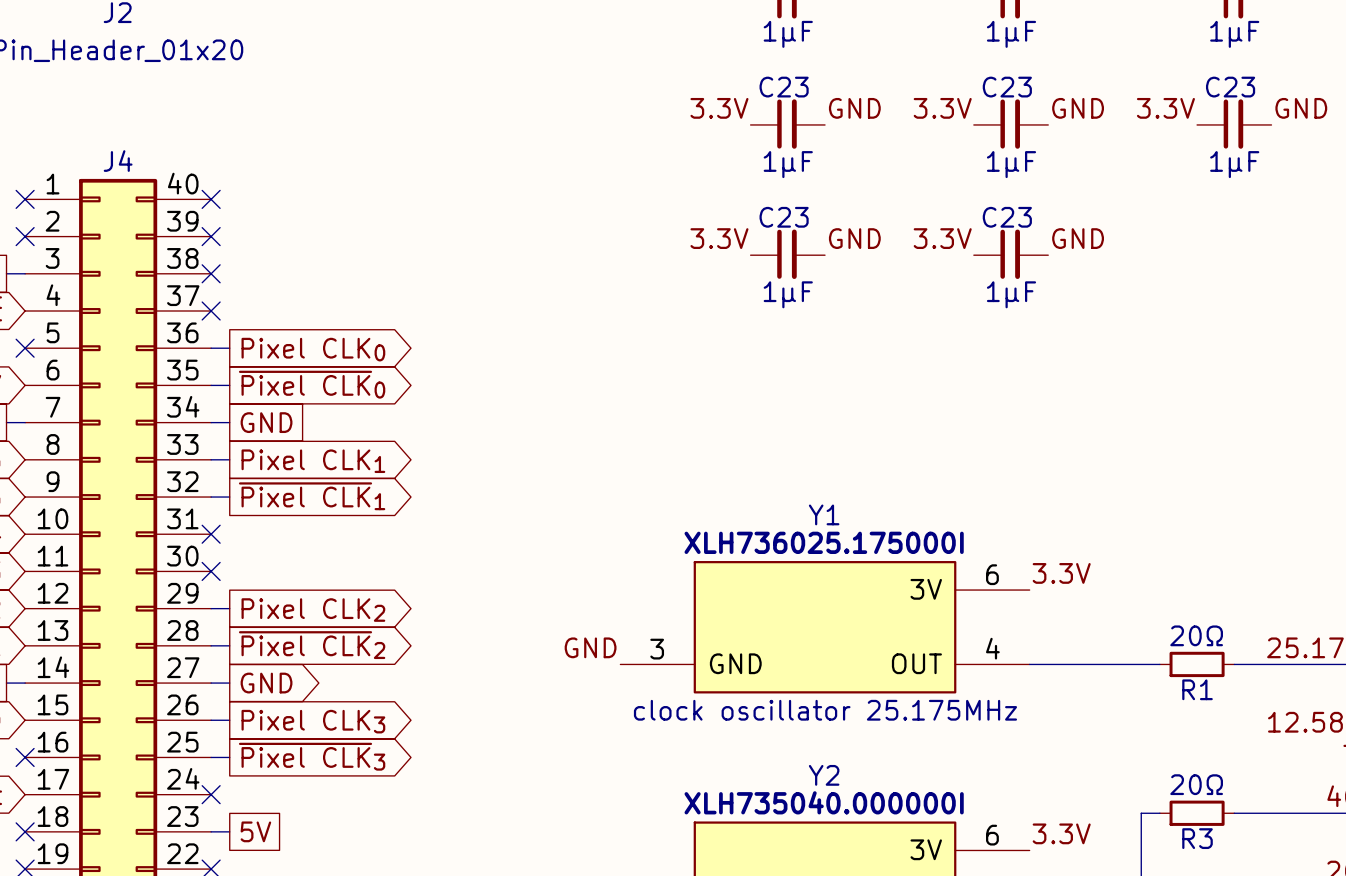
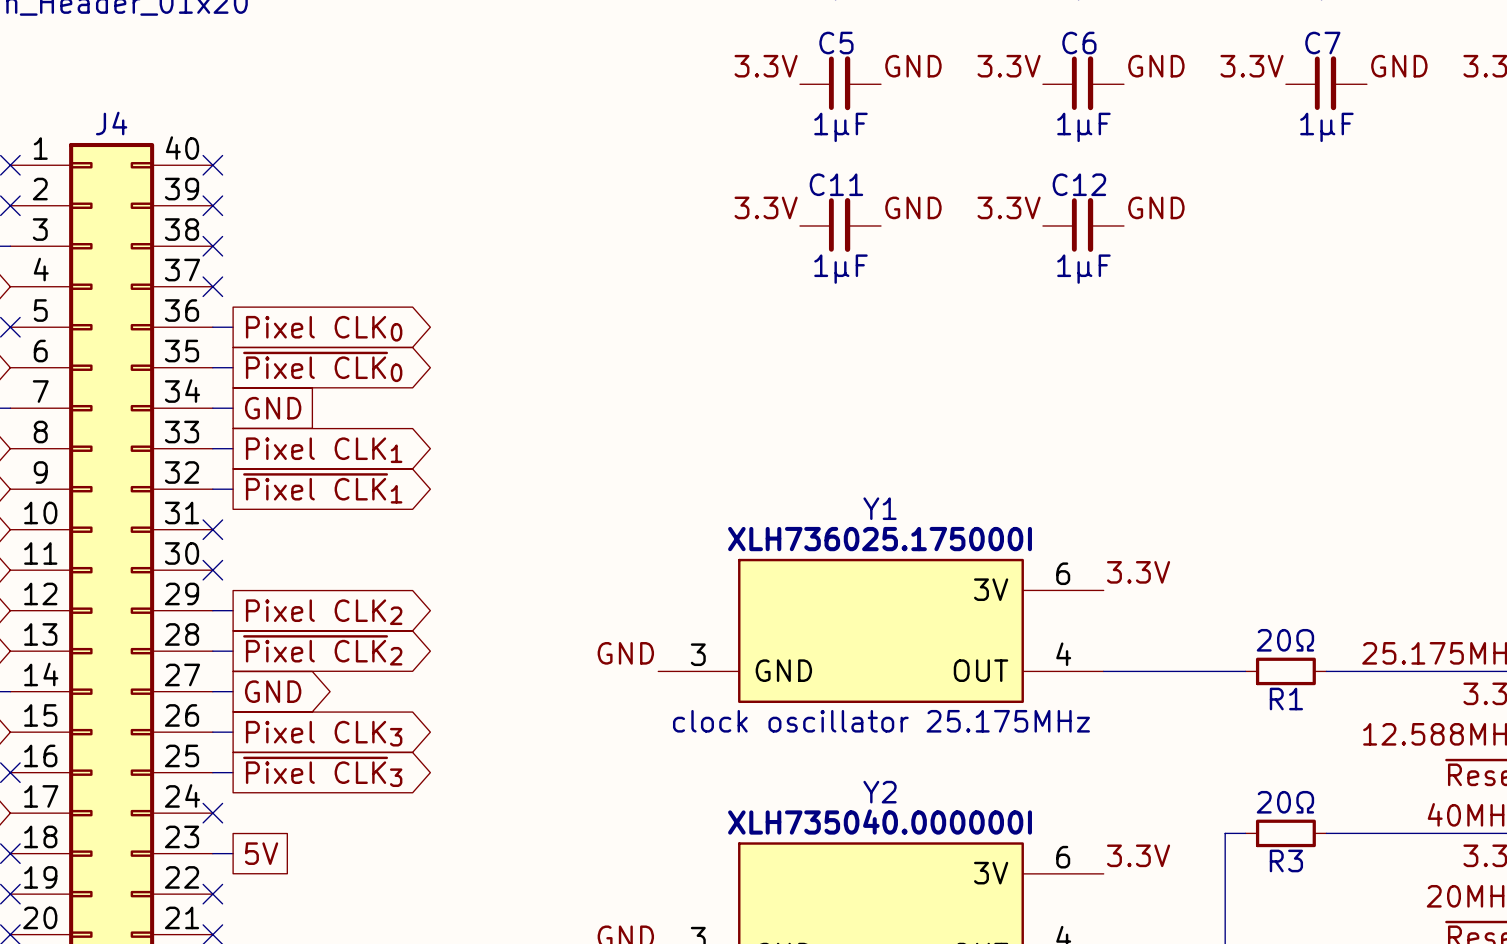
C23 name: C23 (784, 87) -> C5 (836, 43)
C23 name: C23 (1007, 87) -> C6 (1079, 43)
C23 name: C23 (1230, 87) -> C7 (1322, 43)
C23 name: C23 (784, 217) -> C11 (836, 184)
C23 name: C23 (1007, 217) -> C12 (1079, 184)

